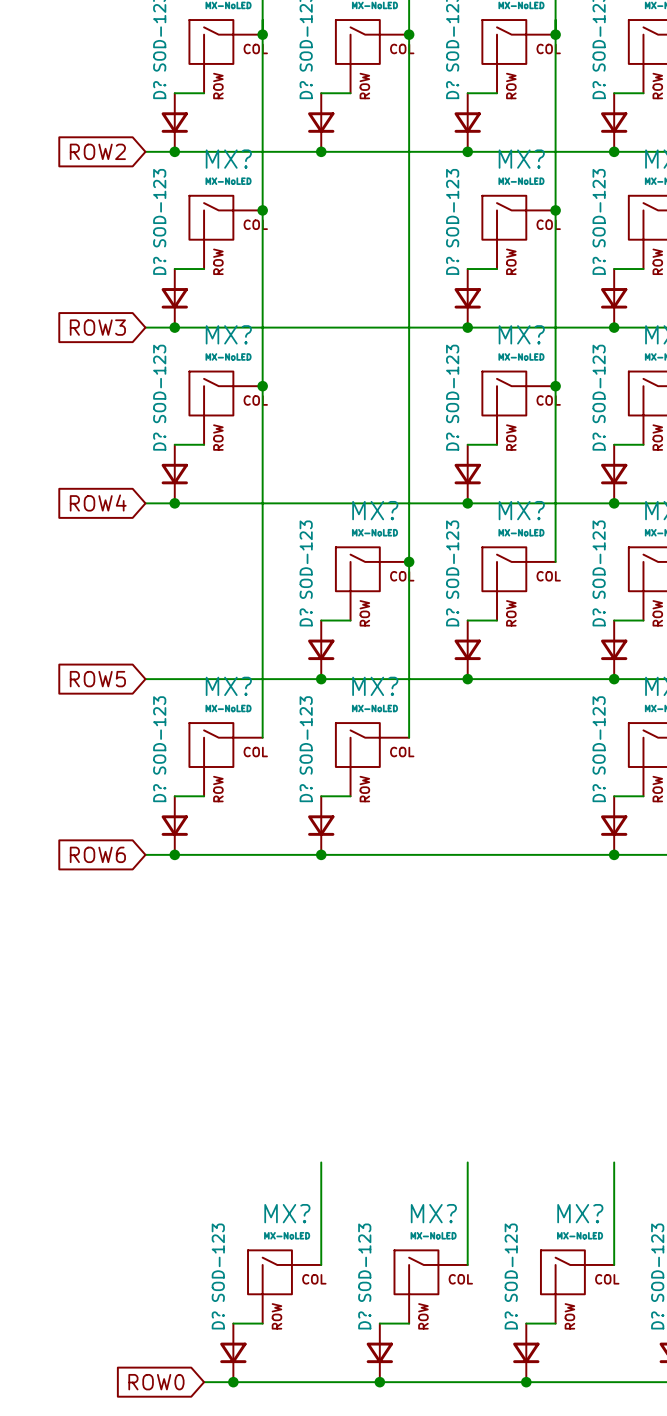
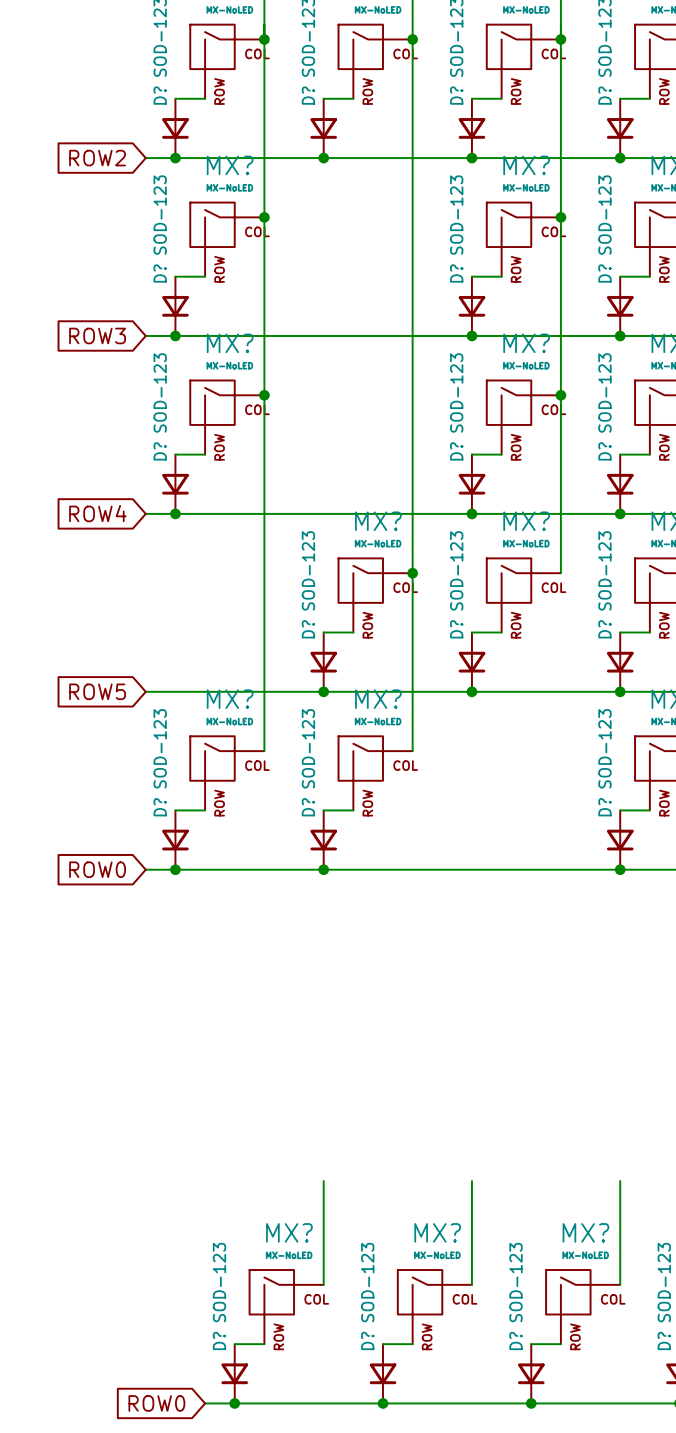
global label: ROW6 (97, 854) -> ROW0 (97, 869)

